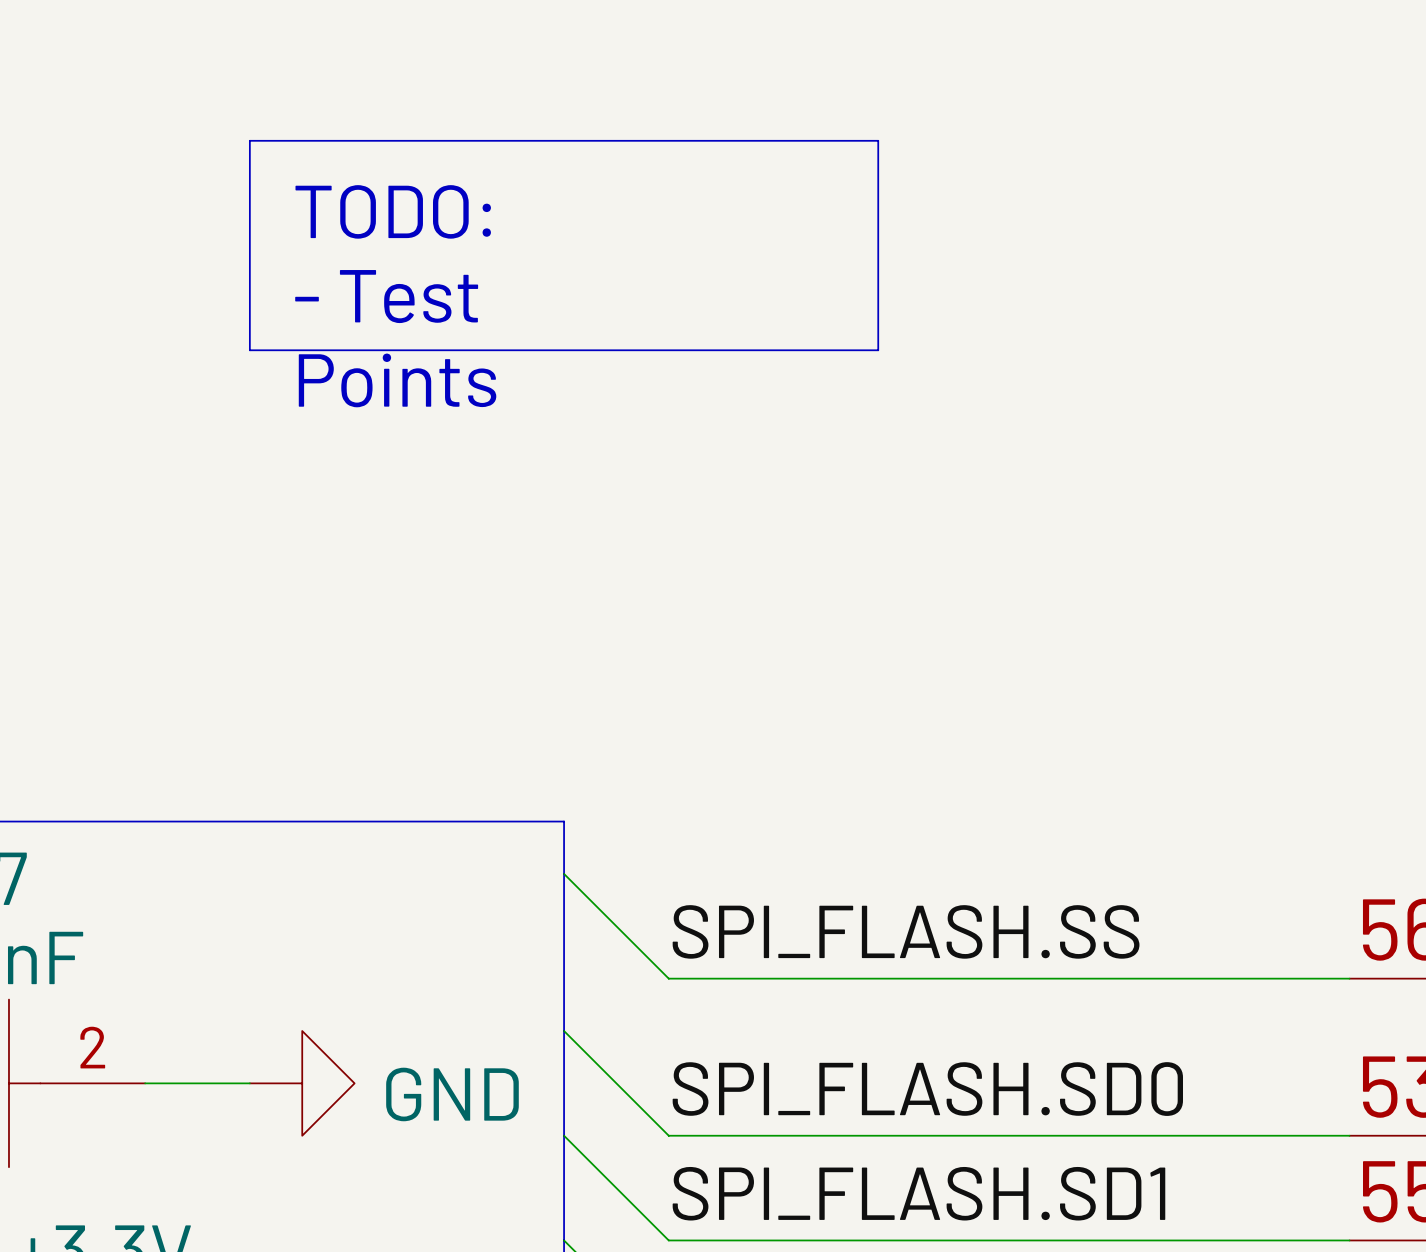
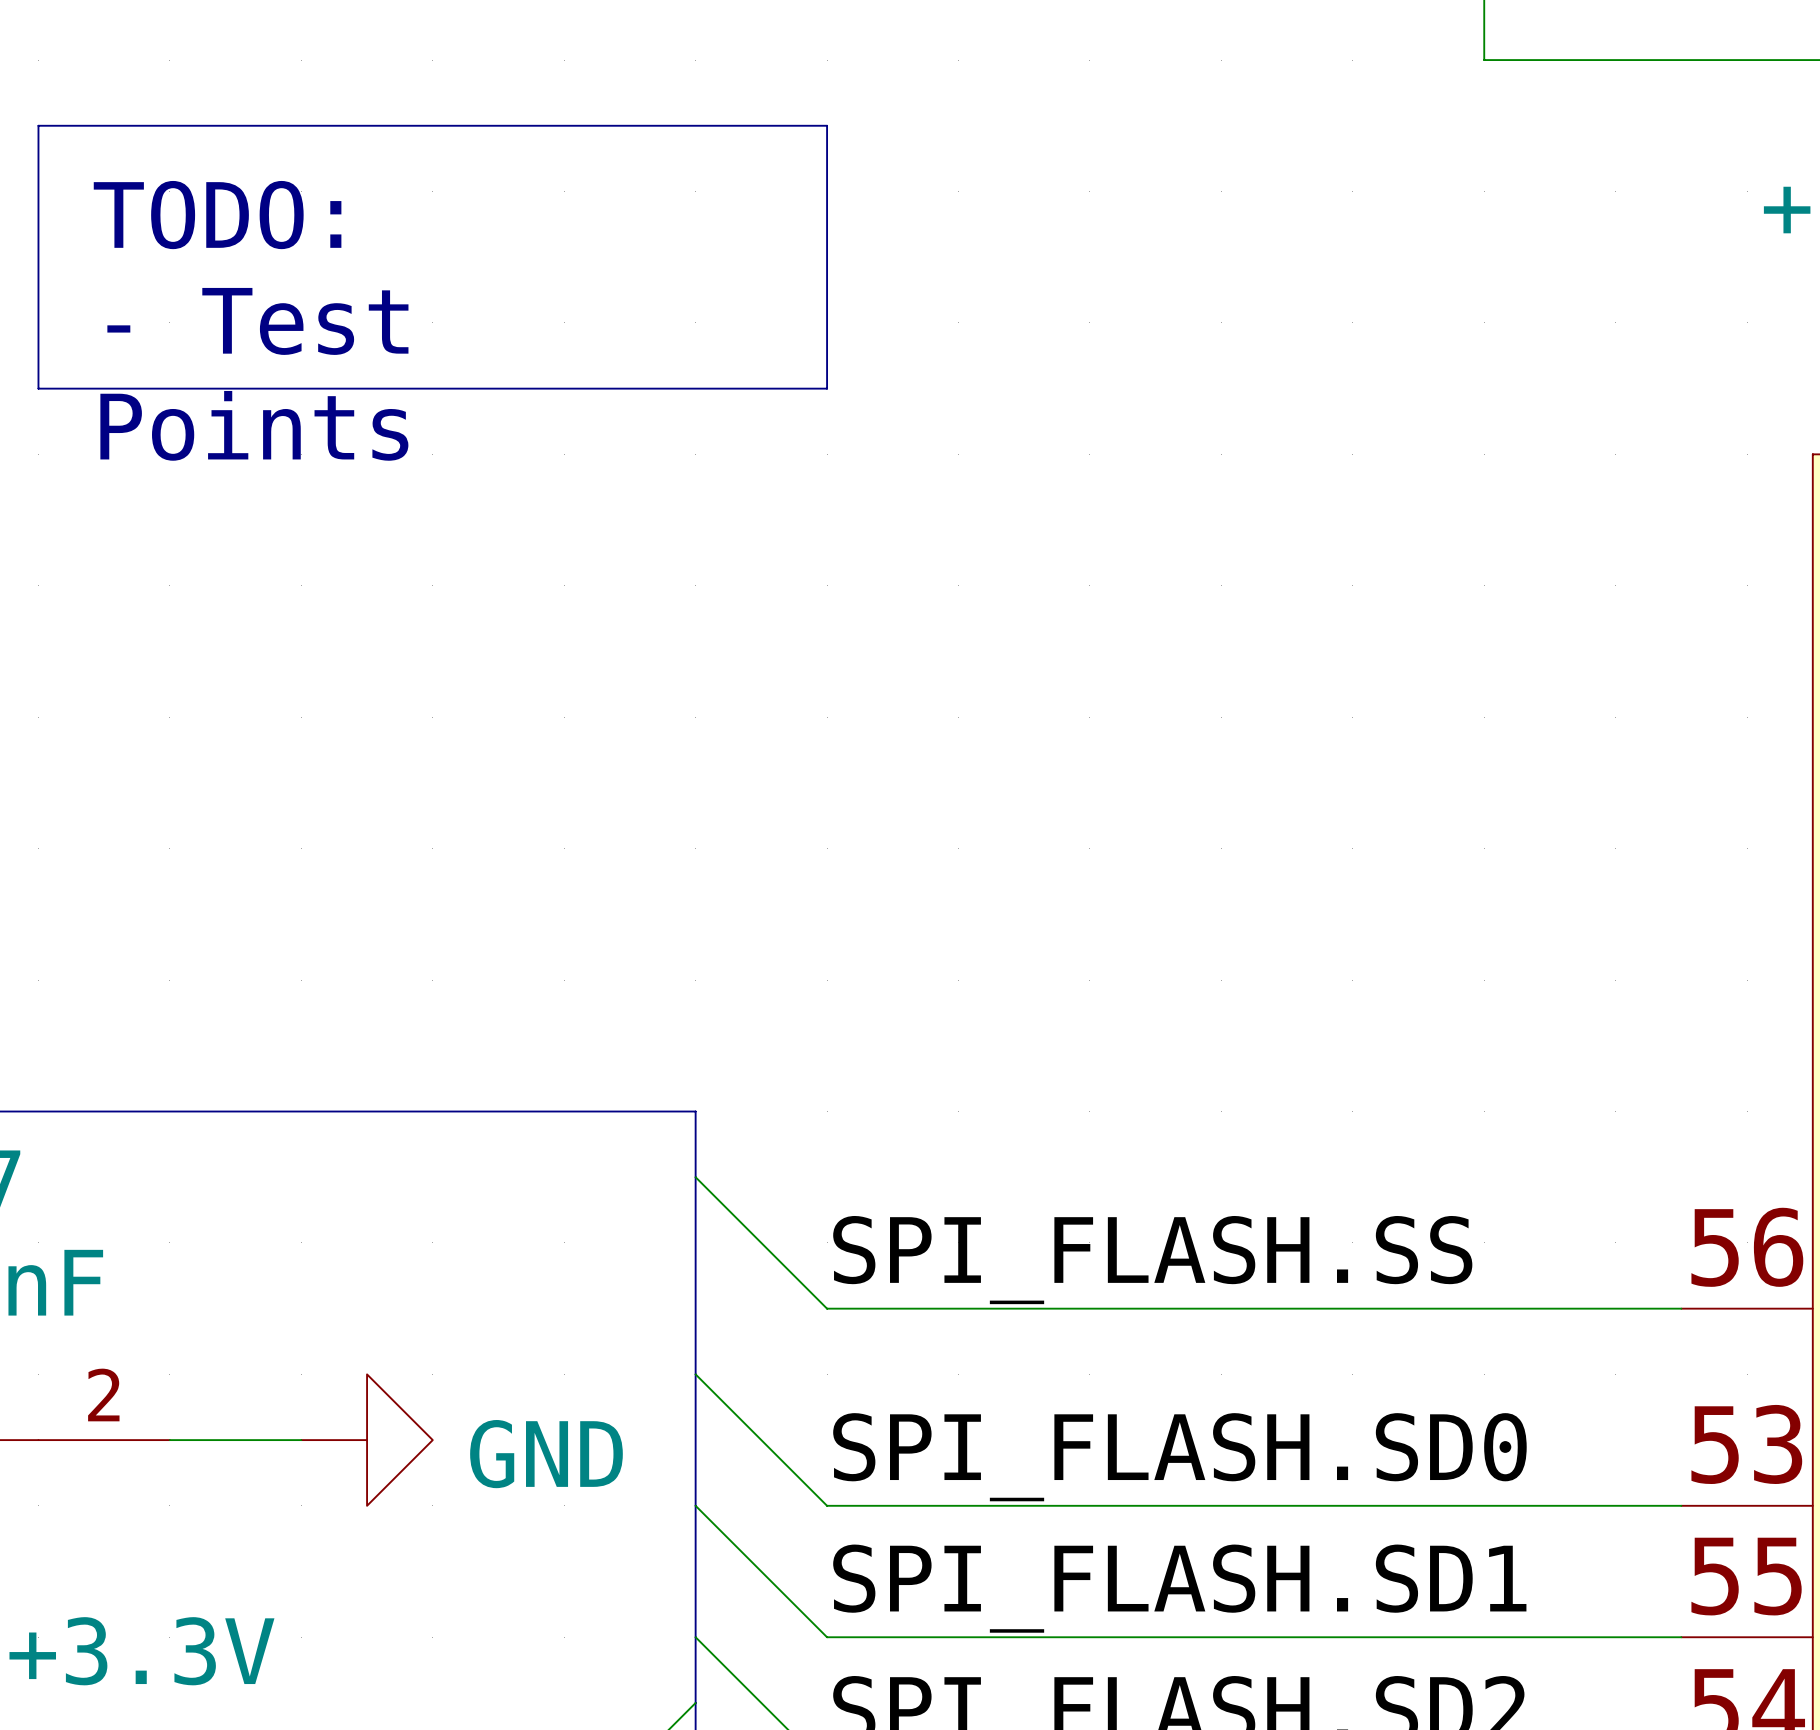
line: (249, 140) (878, 140) (878, 350) (249, 350) (249, 140) -> (38, 125) (827, 125) (827, 388) (38, 388) (38, 125)
text position: TODO: (393, 211) -> TODO: (217, 215)
text position: - Test (386, 296) -> - Test (257, 321)
text position: Points (397, 380) -> Points (254, 425)

